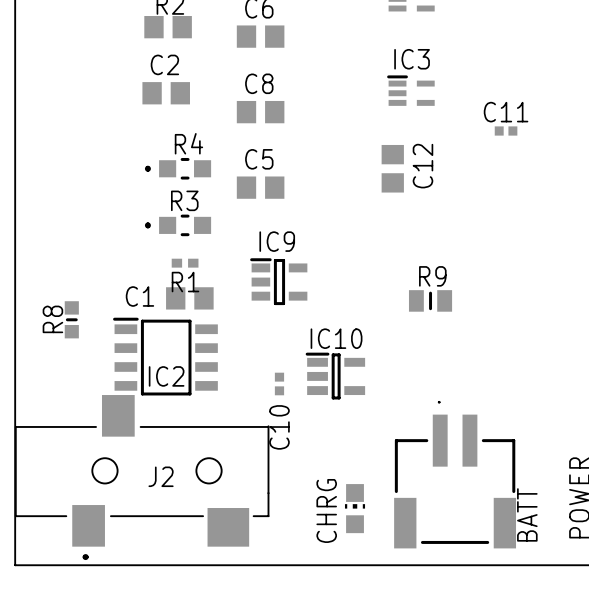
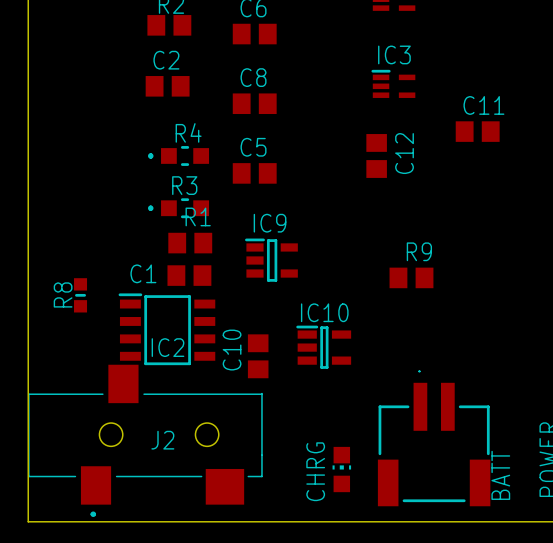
C11 footprint: [494, 126, 518, 136] -> [455, 121, 500, 142]
R1 footprint: [171, 258, 199, 268] -> [168, 232, 213, 254]
R1 name position: R1 (185, 282) -> R1 (198, 216)
R9 footprint: [408, 290, 453, 312] -> [389, 267, 434, 289]
C10 footprint: [274, 372, 285, 396] -> [247, 334, 269, 379]
C10 name position: C10 (279, 427) -> C10 (232, 350)

